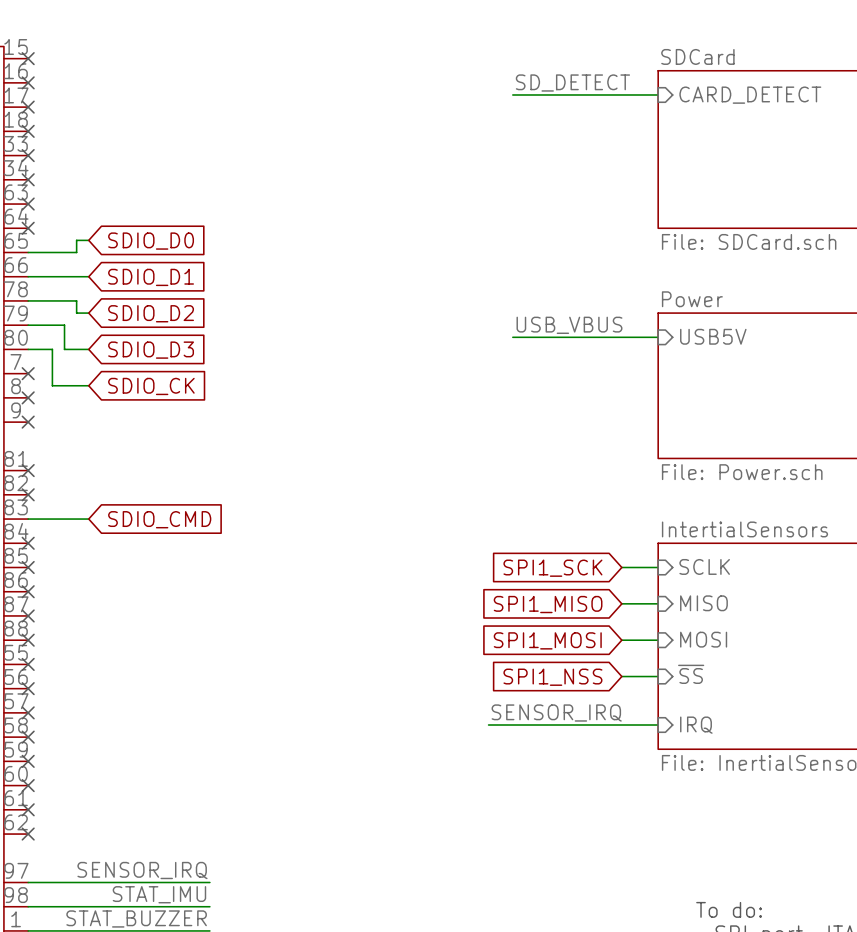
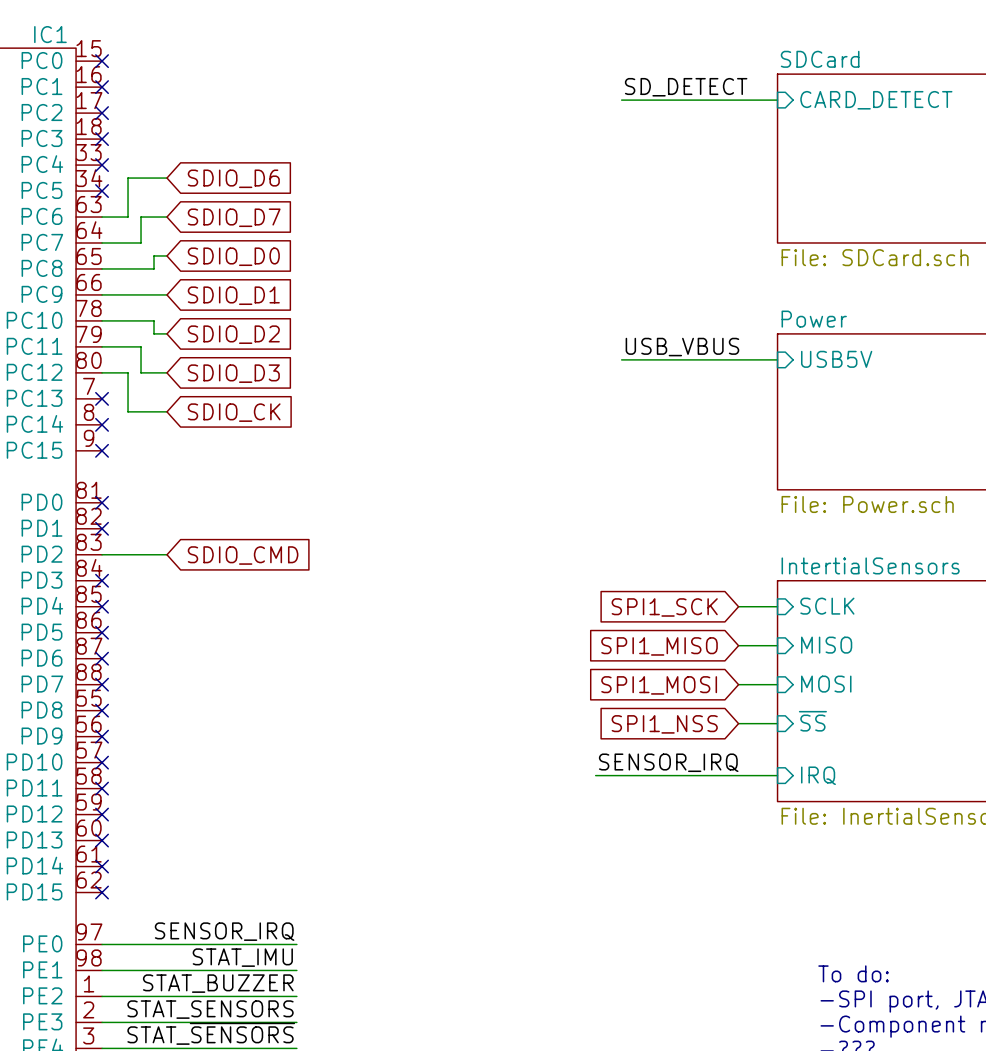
wire: none -> (166, 178) (128, 178) (128, 217) (102, 217)
global label: none -> SDIO_D6 (233, 178)
no-connect mark: (28, 204) -> none
wire: none -> (166, 217) (141, 217) (141, 242) (102, 242)
global label: none -> SDIO_D7 (234, 217)
no-connect mark: (28, 228) -> none

